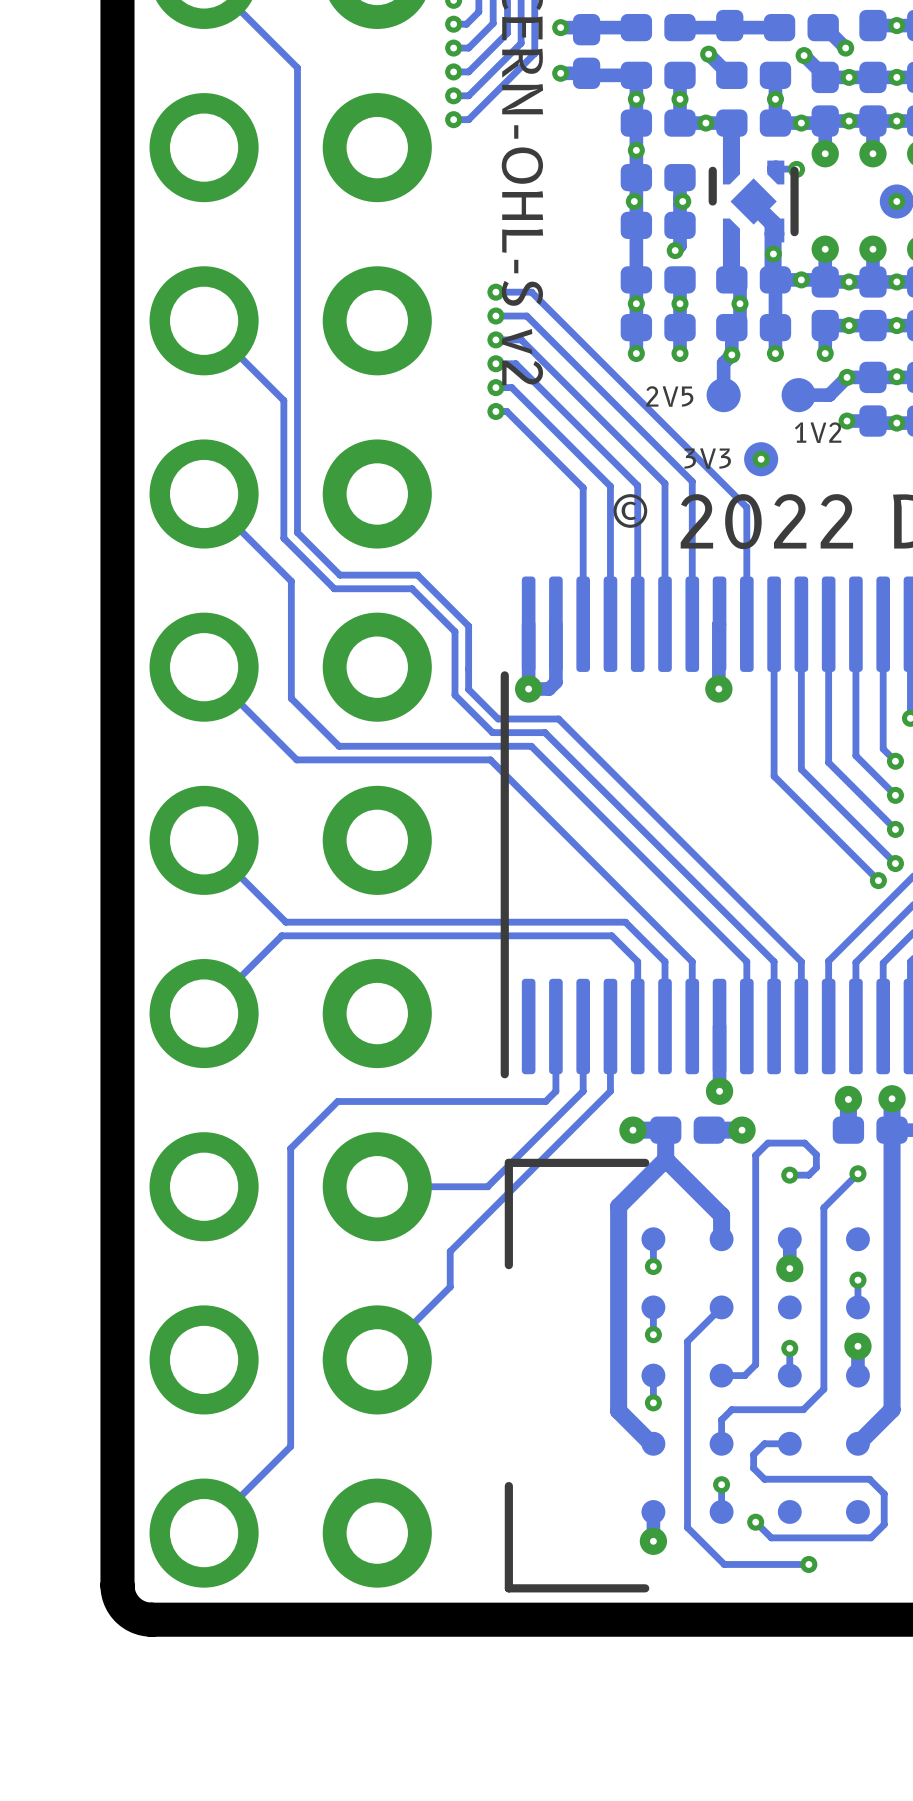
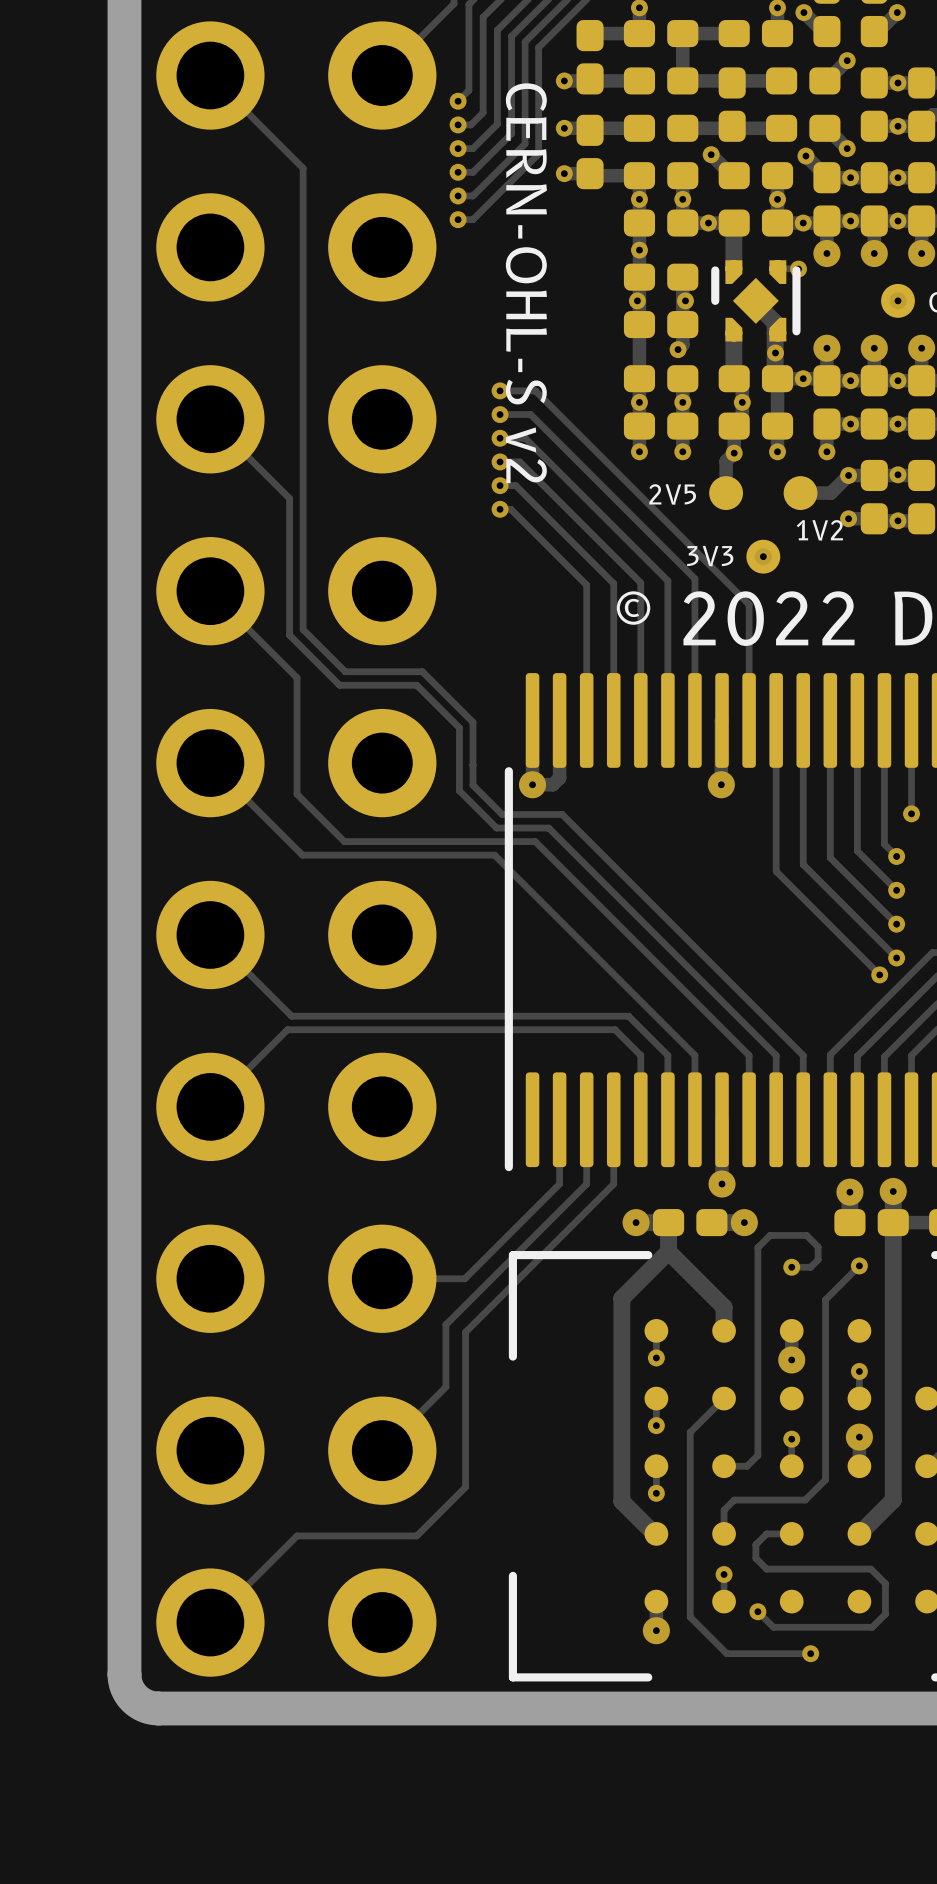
track: (545, 1101) (337, 1101) (290, 1148) (290, 1446) -> (465, 1332) (465, 1487) (416, 1535) (297, 1535)
track: (487, 1186) (460, 1186) -> (549, 1194) (464, 1278)
track: (461, 1240) (450, 1251) (450, 1286) (441, 1295) -> (491, 1278) (445, 1324) (445, 1387)

